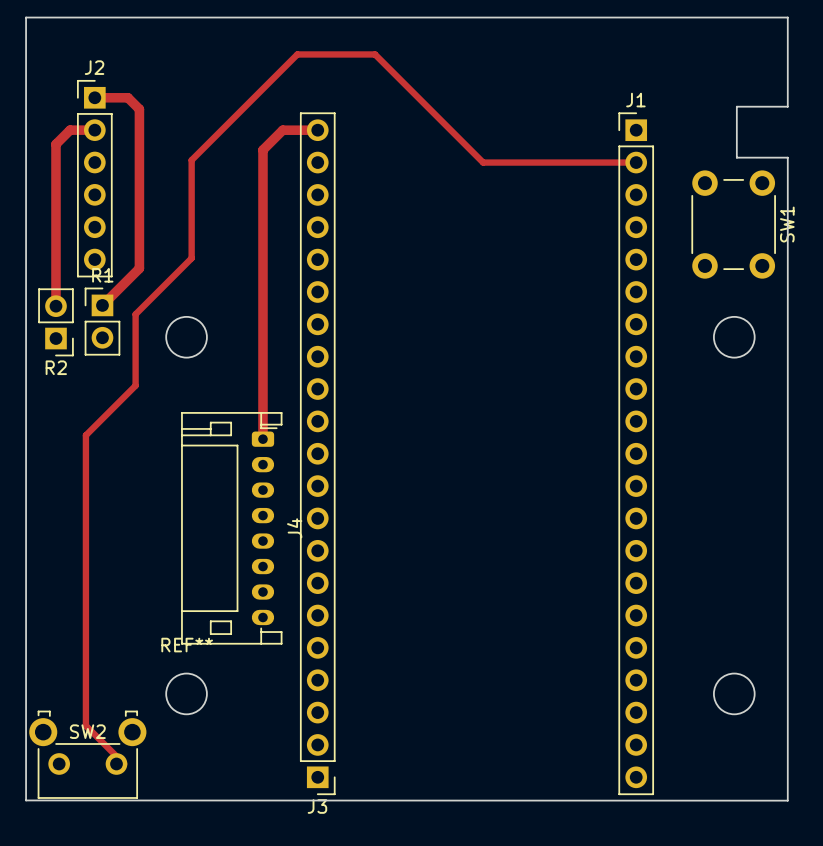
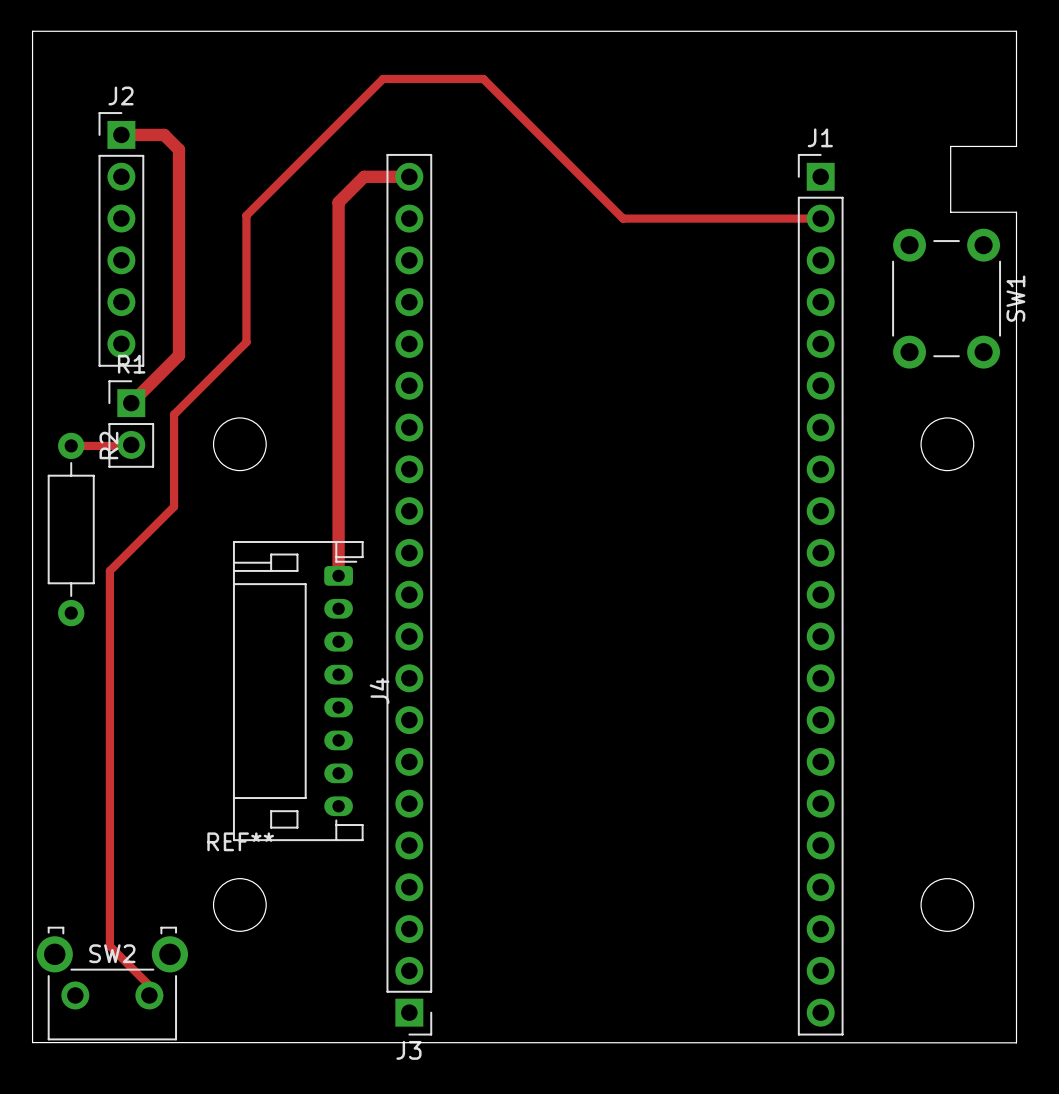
track: (94, 130) (70, 130) (55, 144) (55, 306) -> none
R2 footprint: [38, 288, 74, 357] -> [47, 432, 95, 627]
track: none -> (131, 444) (71, 445)
R2 name position: R2 (56, 367) -> R2 (108, 445)

